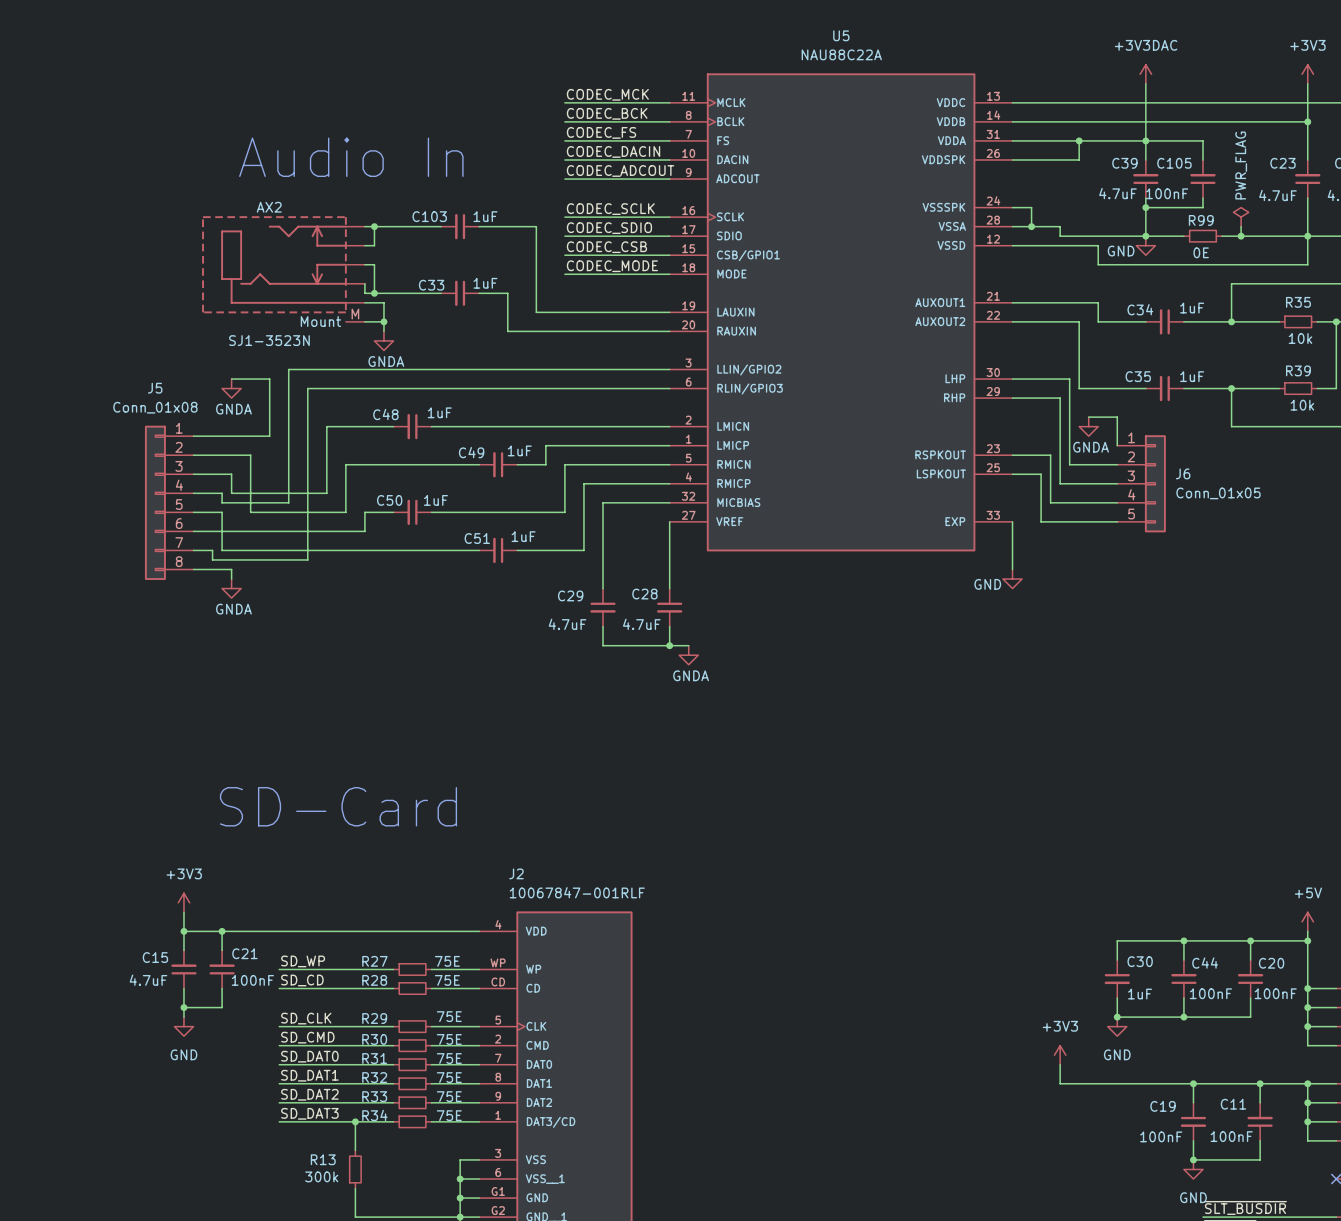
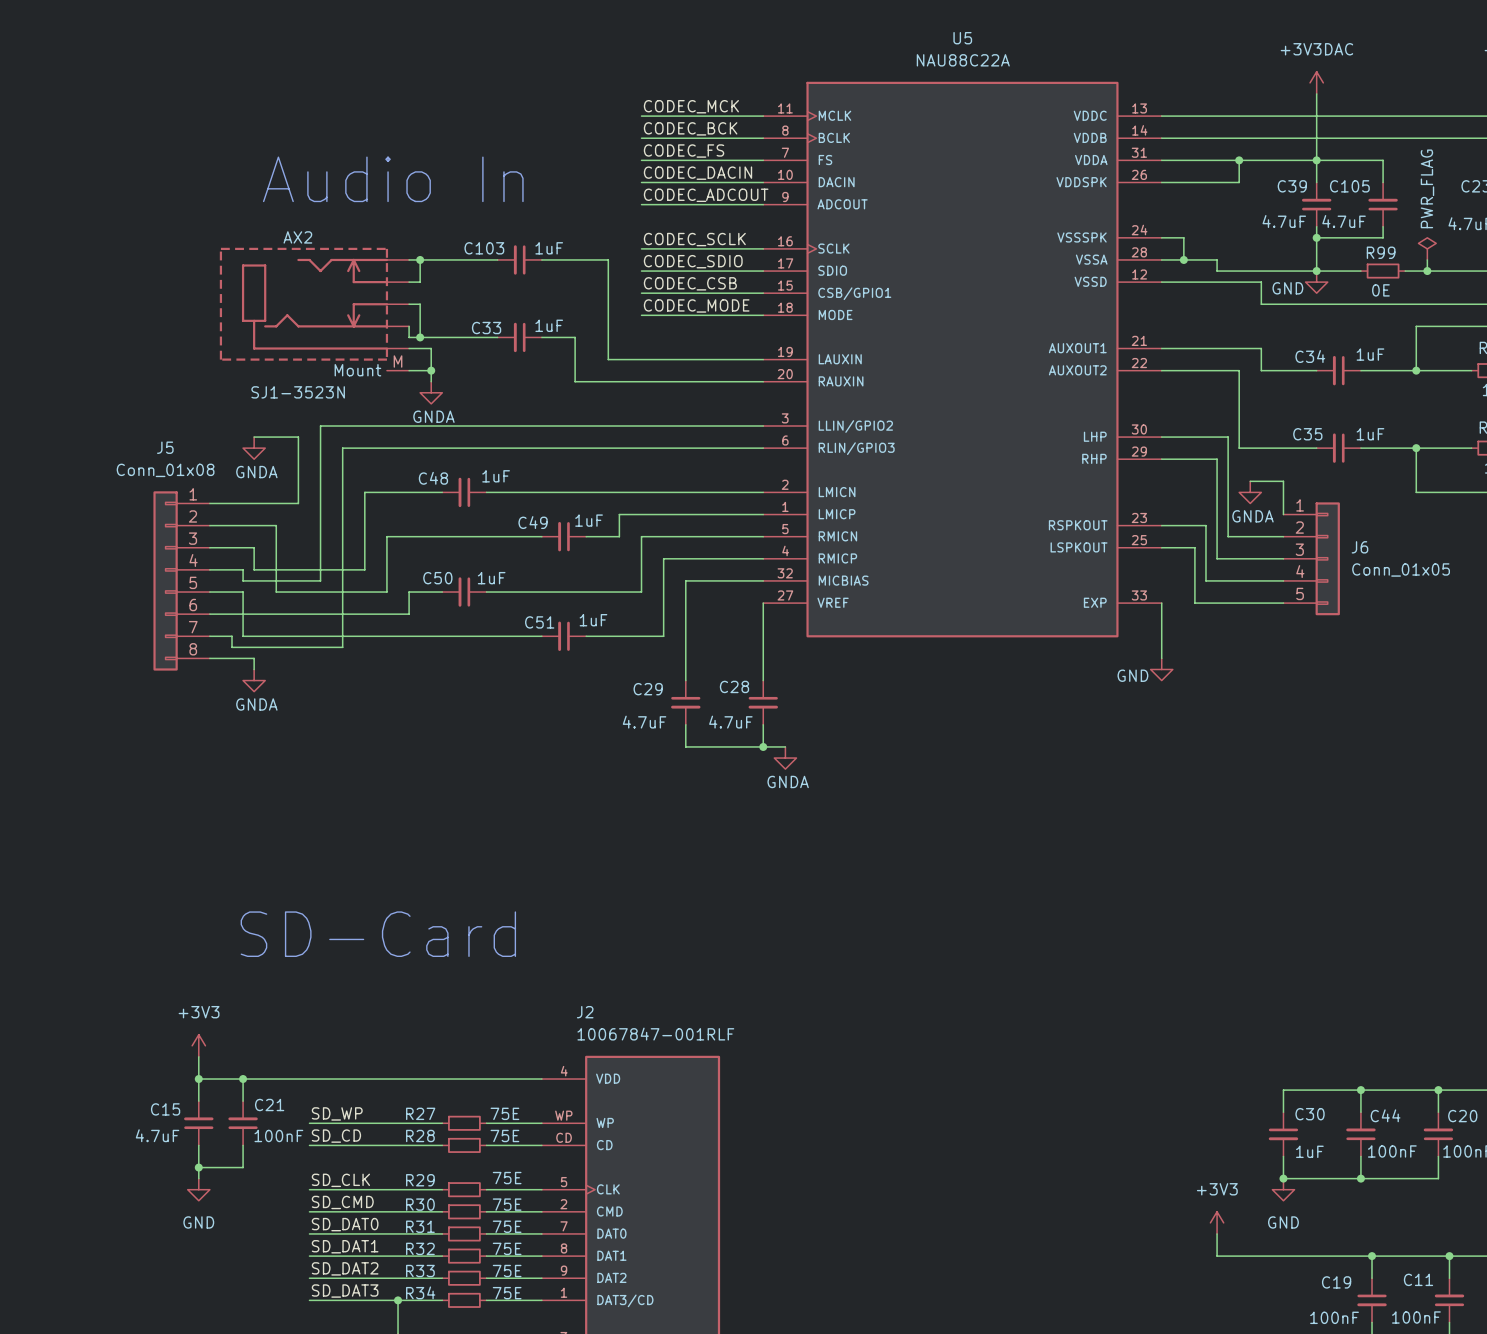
C105 value: 100nF (1167, 193) -> 4.7uF (1344, 221)

